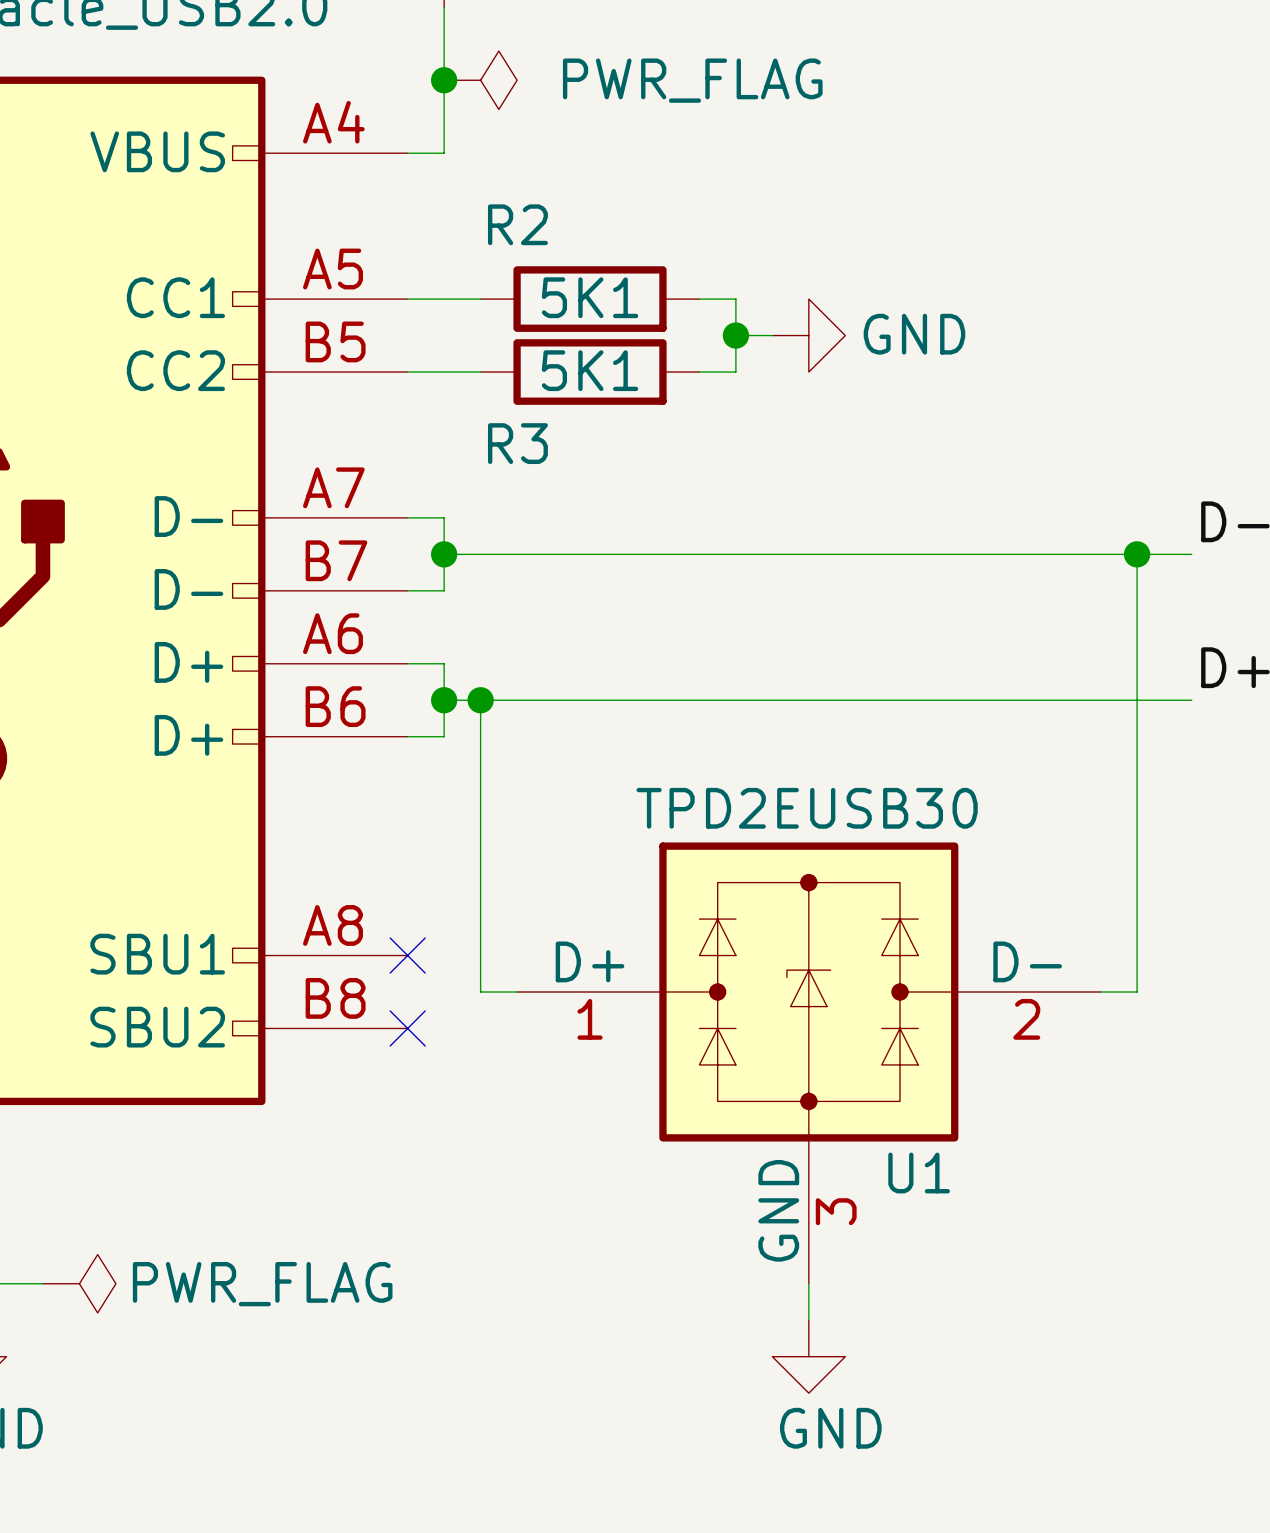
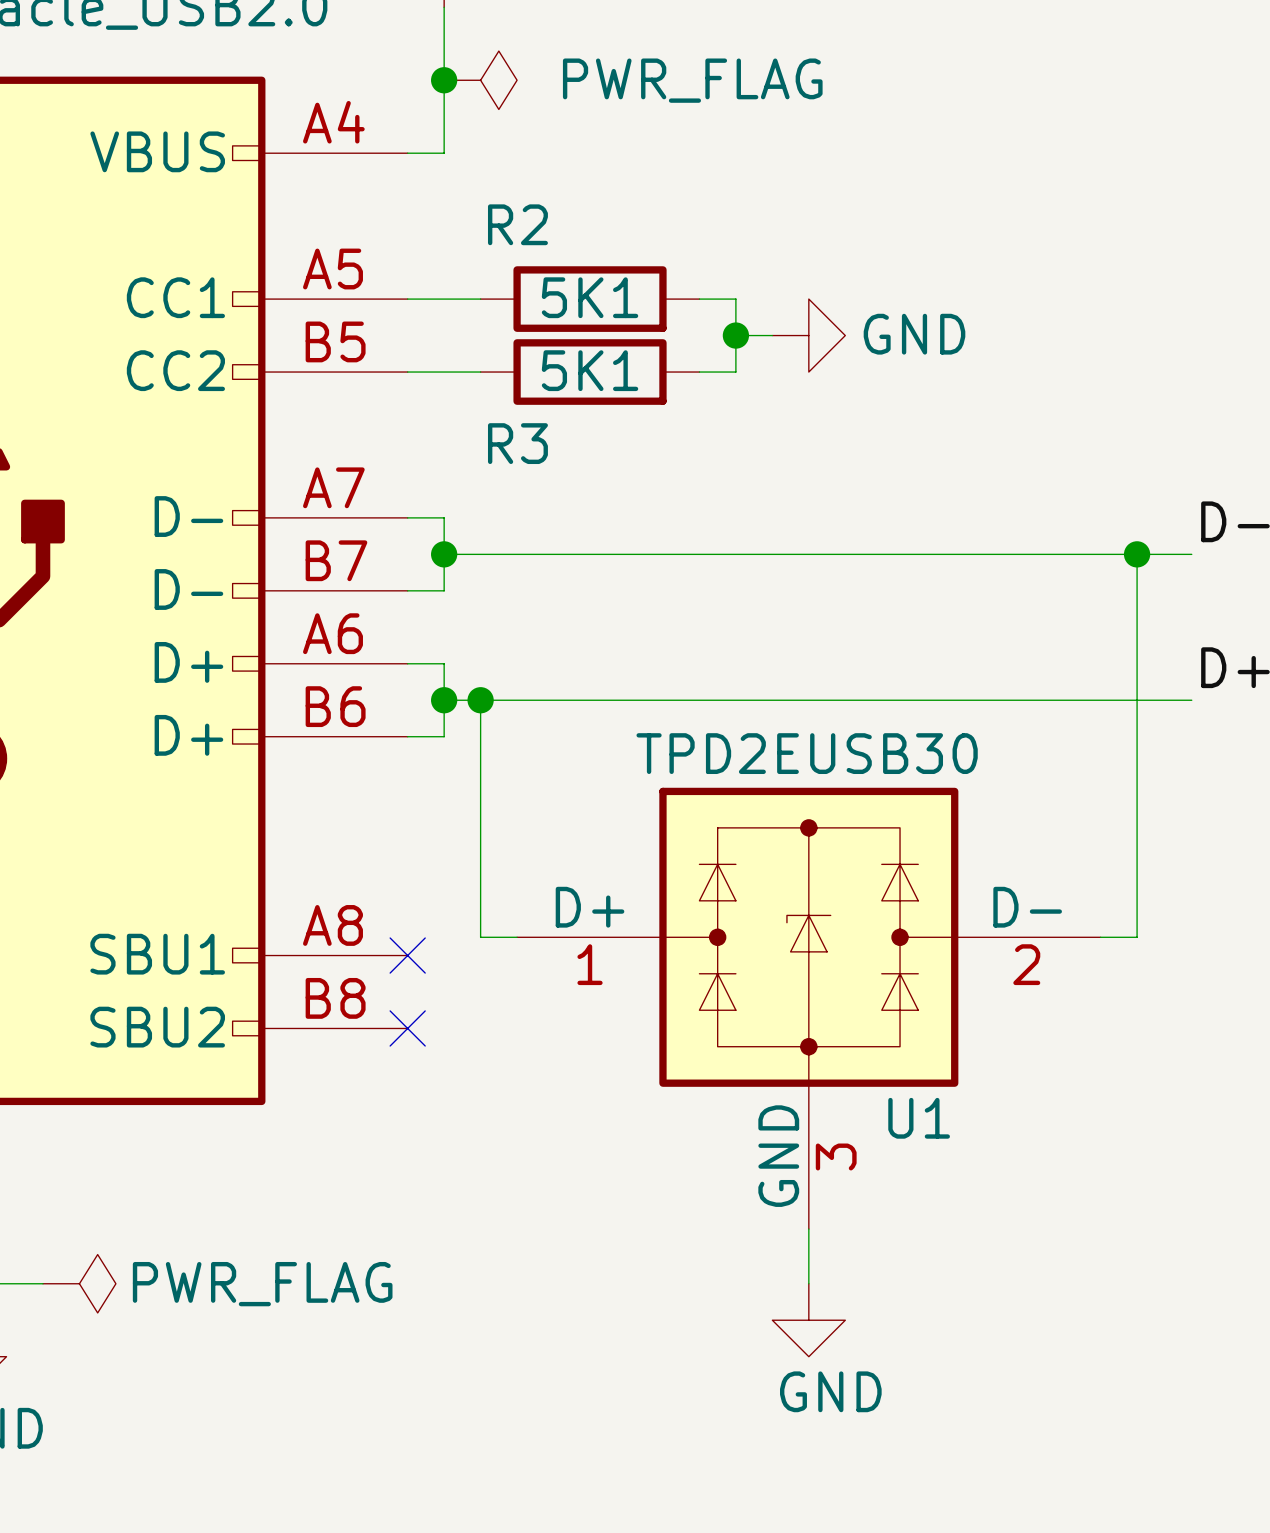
wire: (480, 937) (480, 992) (517, 992) -> (480, 937) (517, 937)
wire: (1137, 937) (1137, 992) (1100, 992) -> (1137, 937) (1100, 937)
U1 position: (808, 1063) -> (808, 1008)
power symbol position: GND (808, 1356) -> GND (808, 1320)

